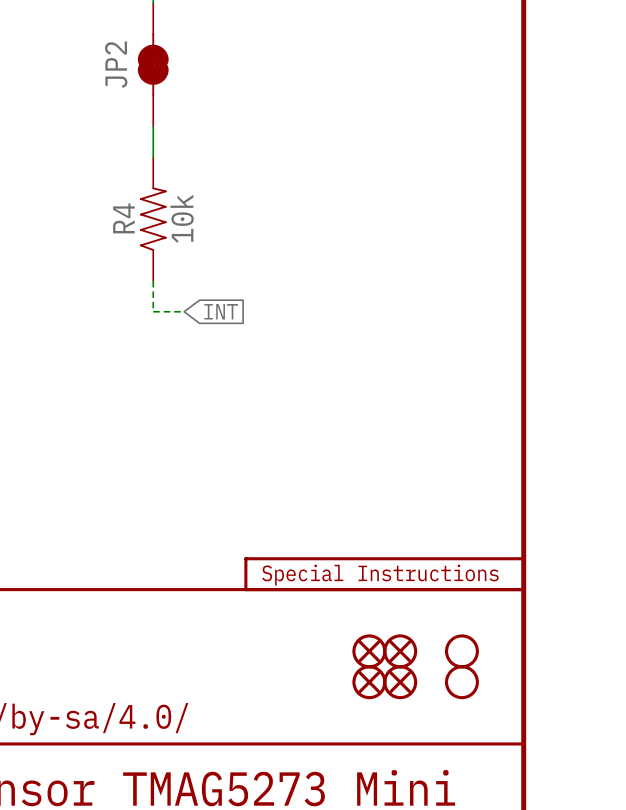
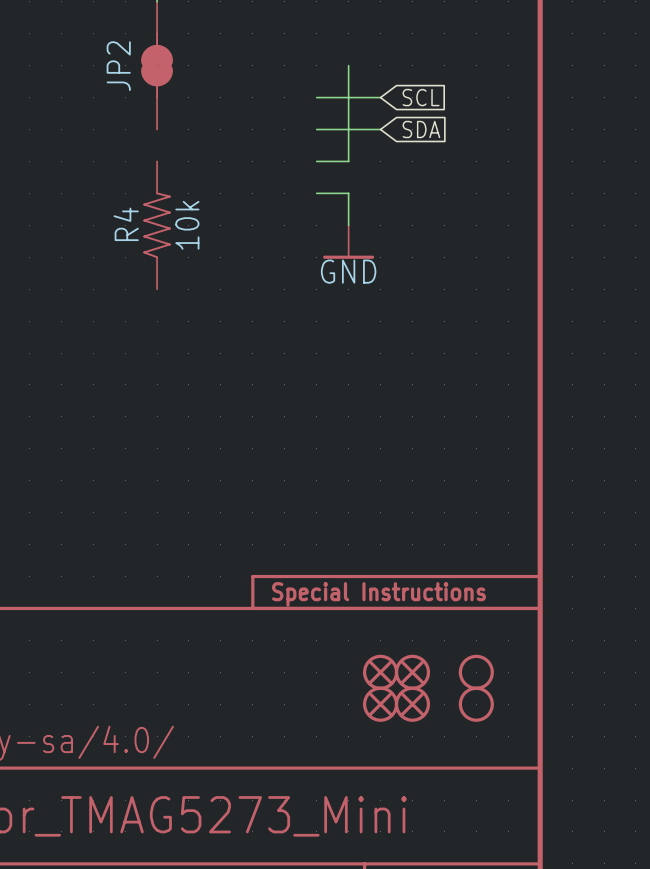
wire: none -> (348, 65) (348, 161) (316, 161)
wire: none -> (316, 97) (380, 97)
global label: none -> SCL (421, 97)
wire: (153, 126) (153, 157) -> none
wire: none -> (316, 129) (380, 129)
global label: none -> SDA (421, 129)
wire: none -> (316, 193) (348, 193) (348, 225)
power symbol: none -> GND (348, 242)
wire: (153, 280) (153, 311) (184, 311) -> none
global label: INT (221, 311) -> none

